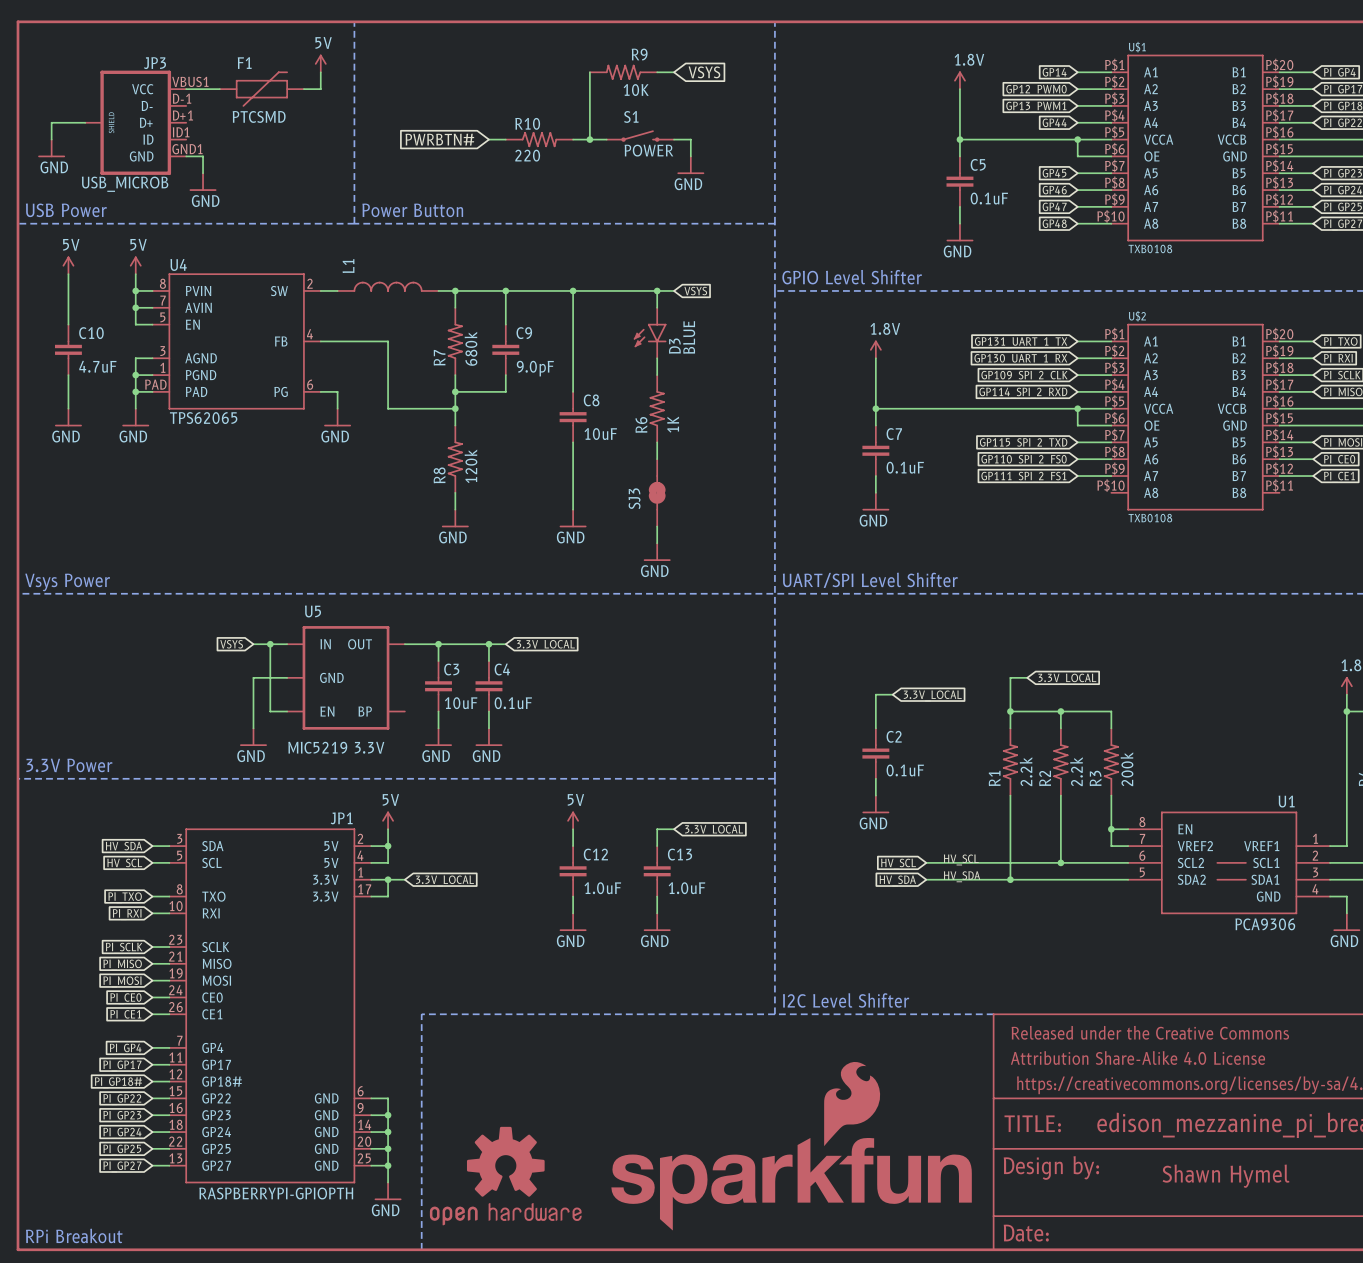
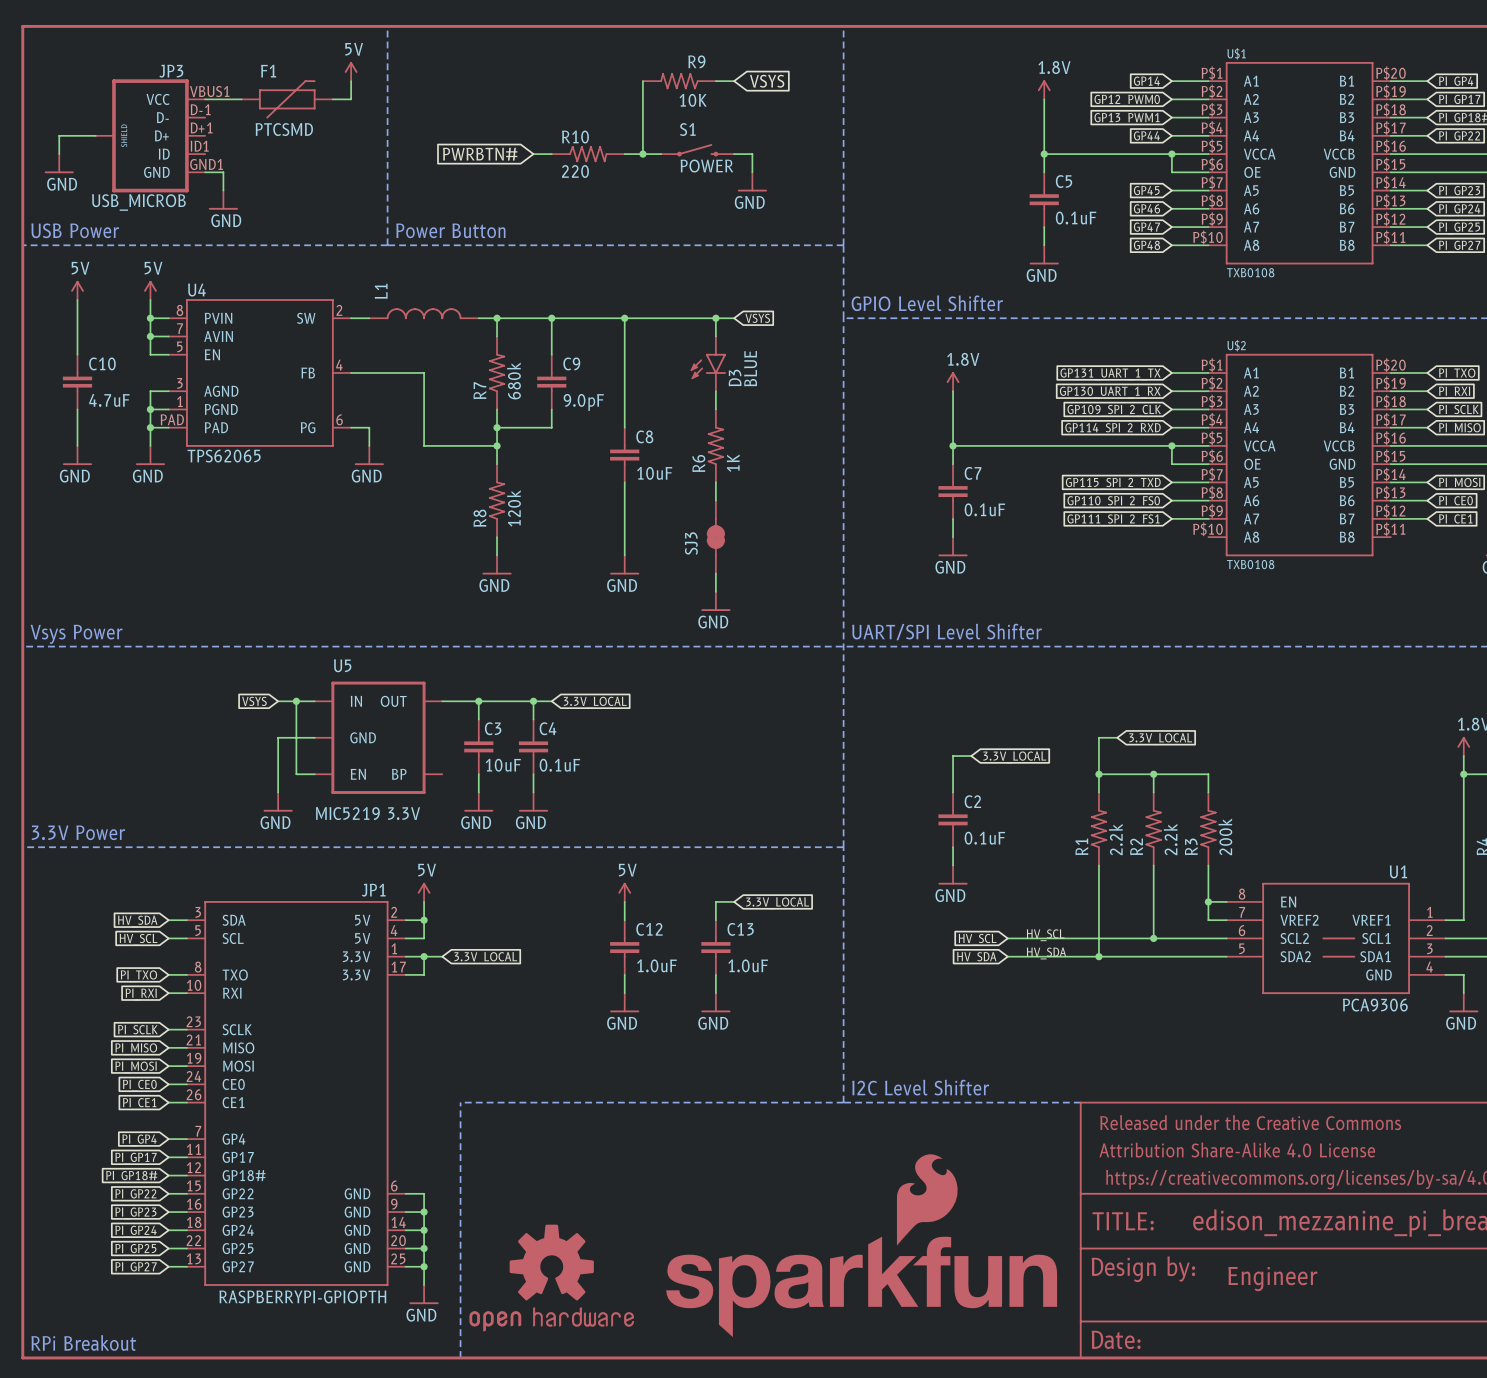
text: Shawn Hymel (1226, 1176) -> none
text: none -> Engineer (1272, 1279)

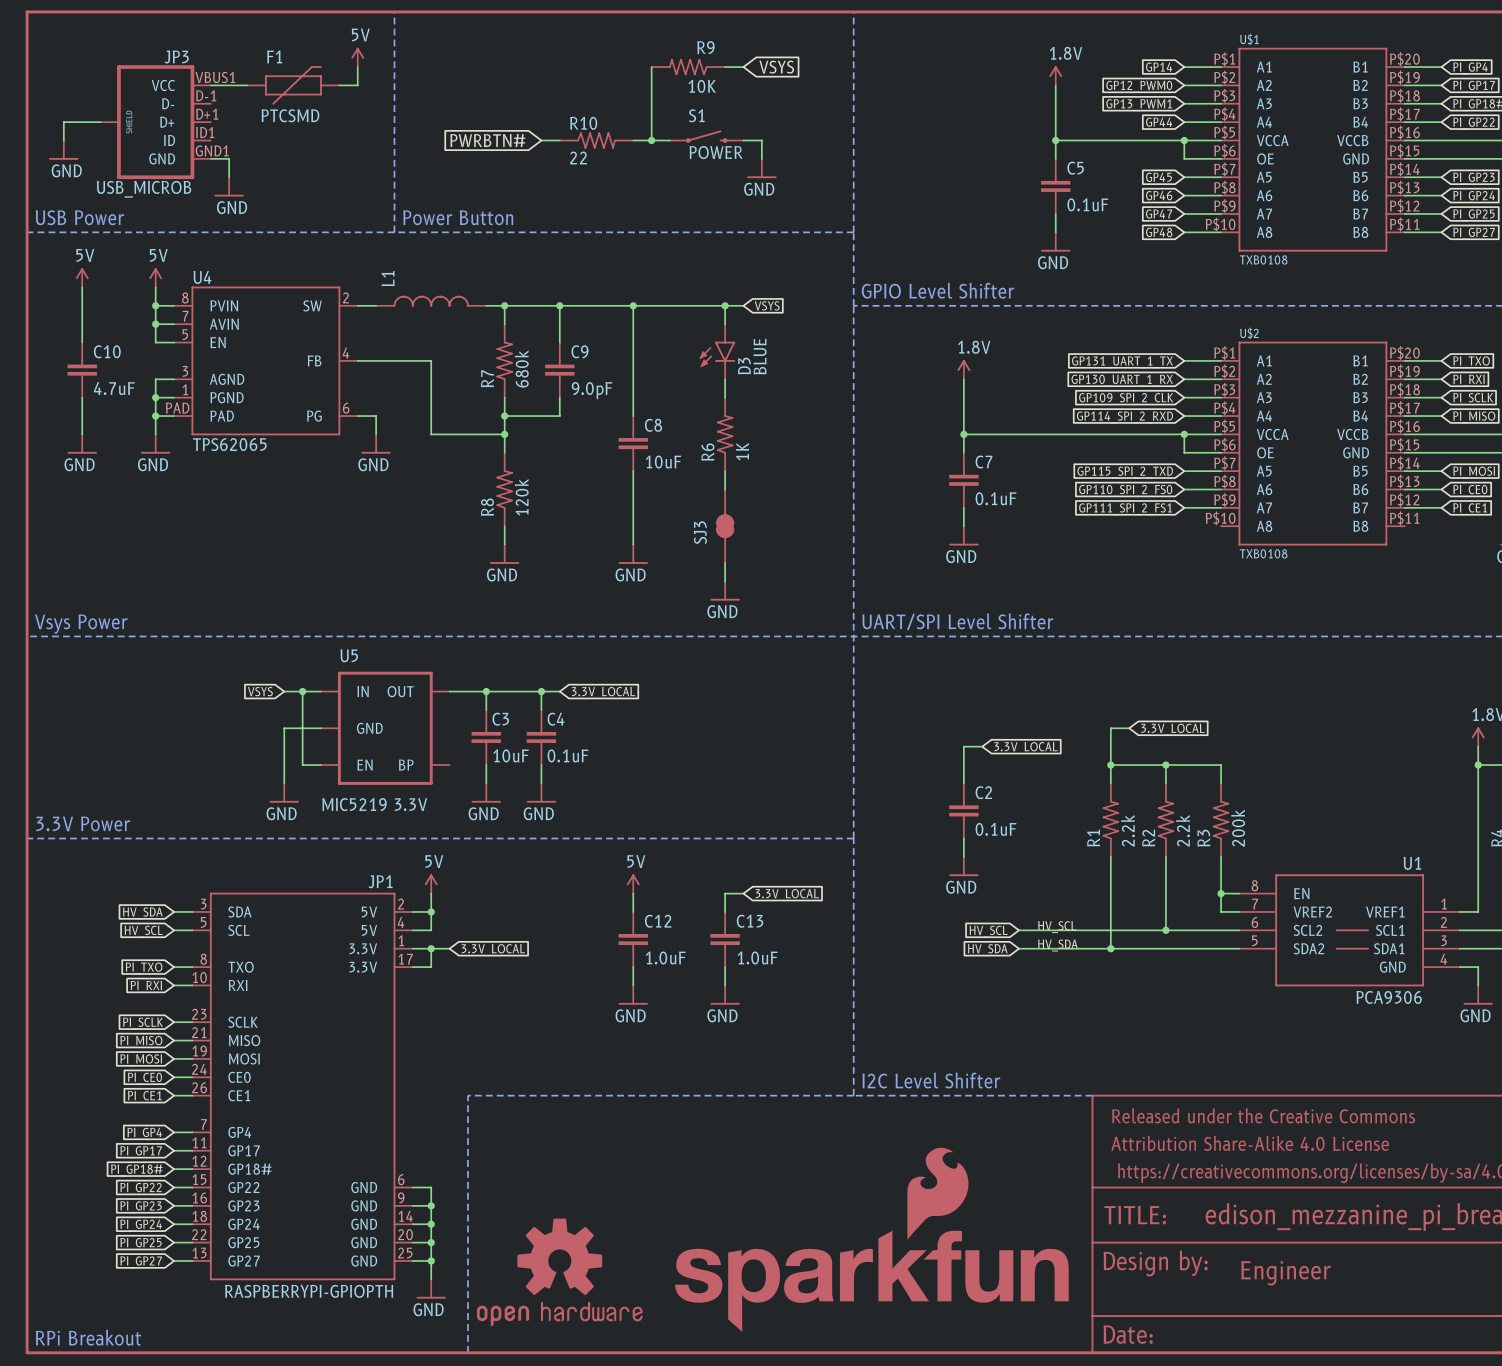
R10 value: 220 (575, 171) -> 22 (578, 157)

